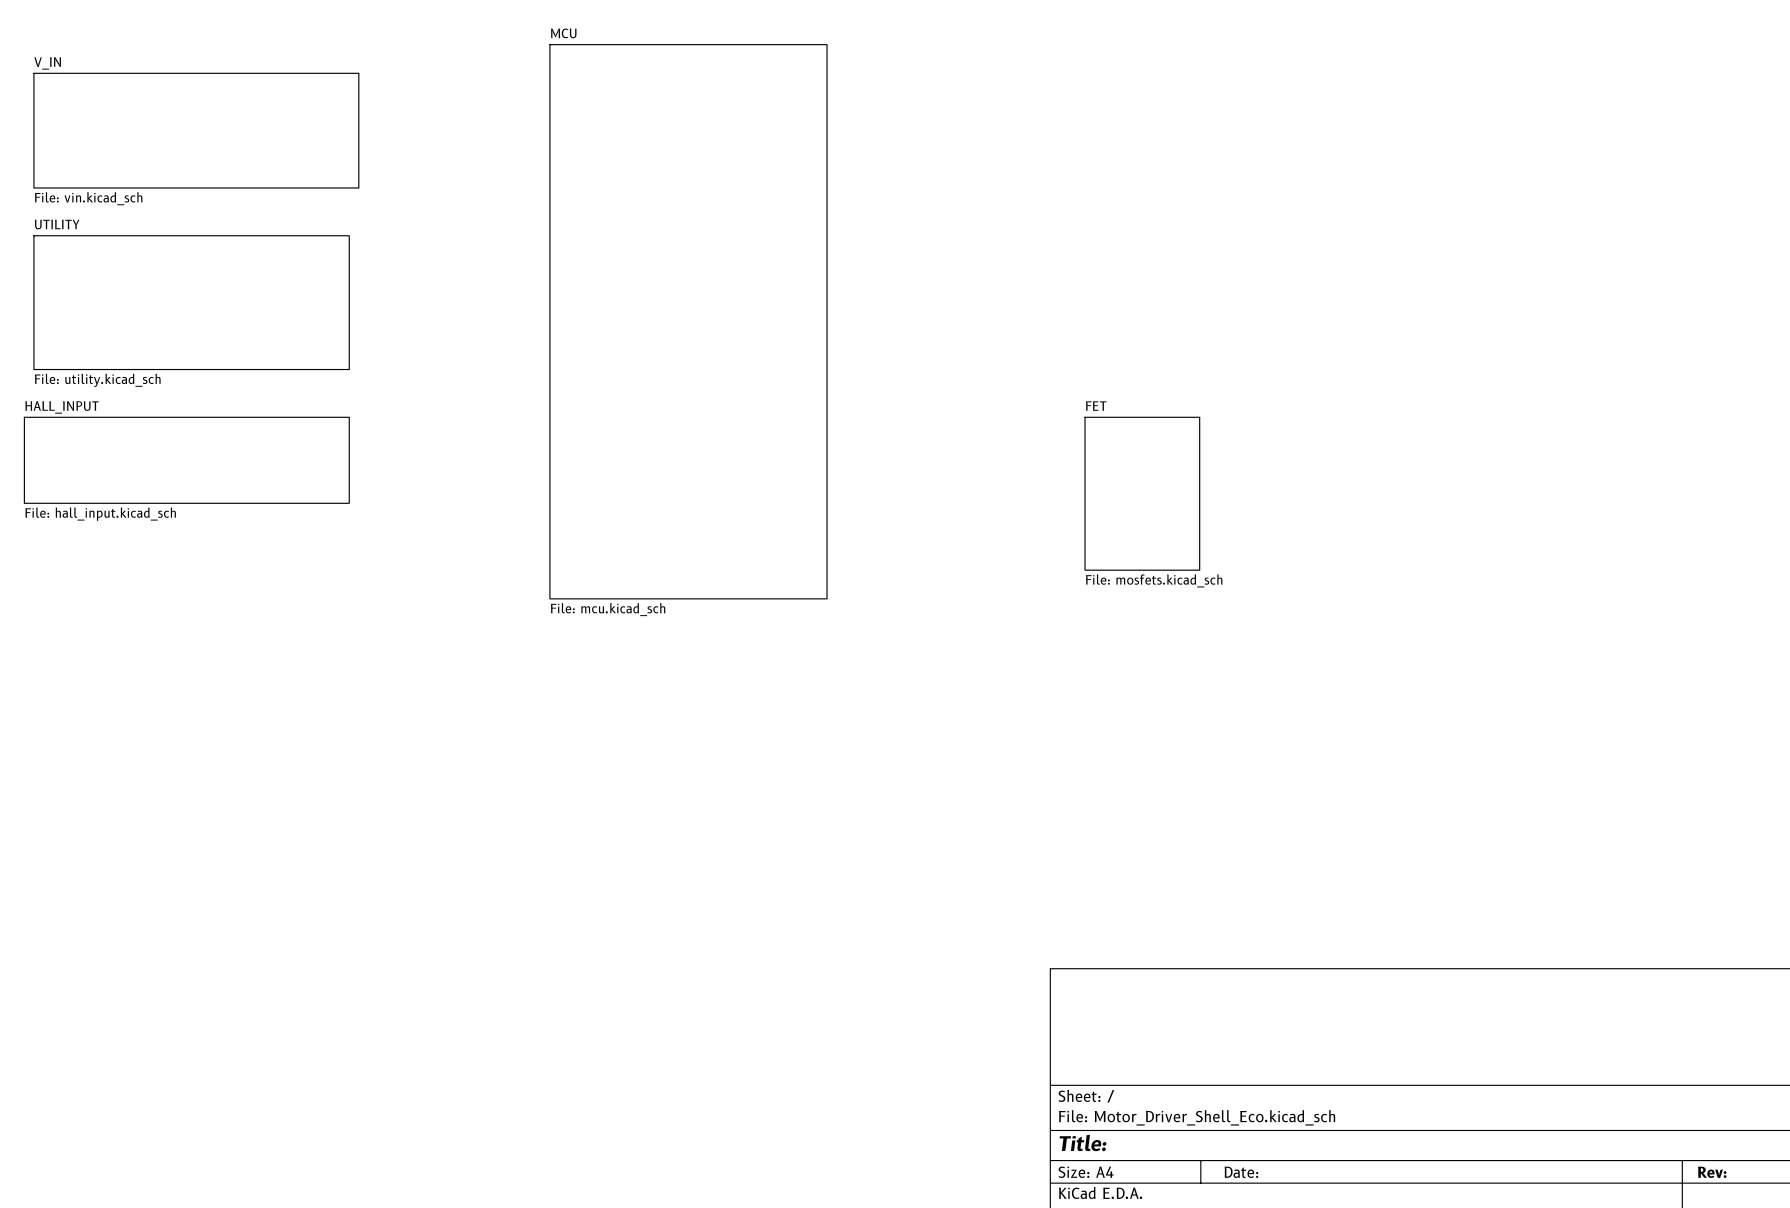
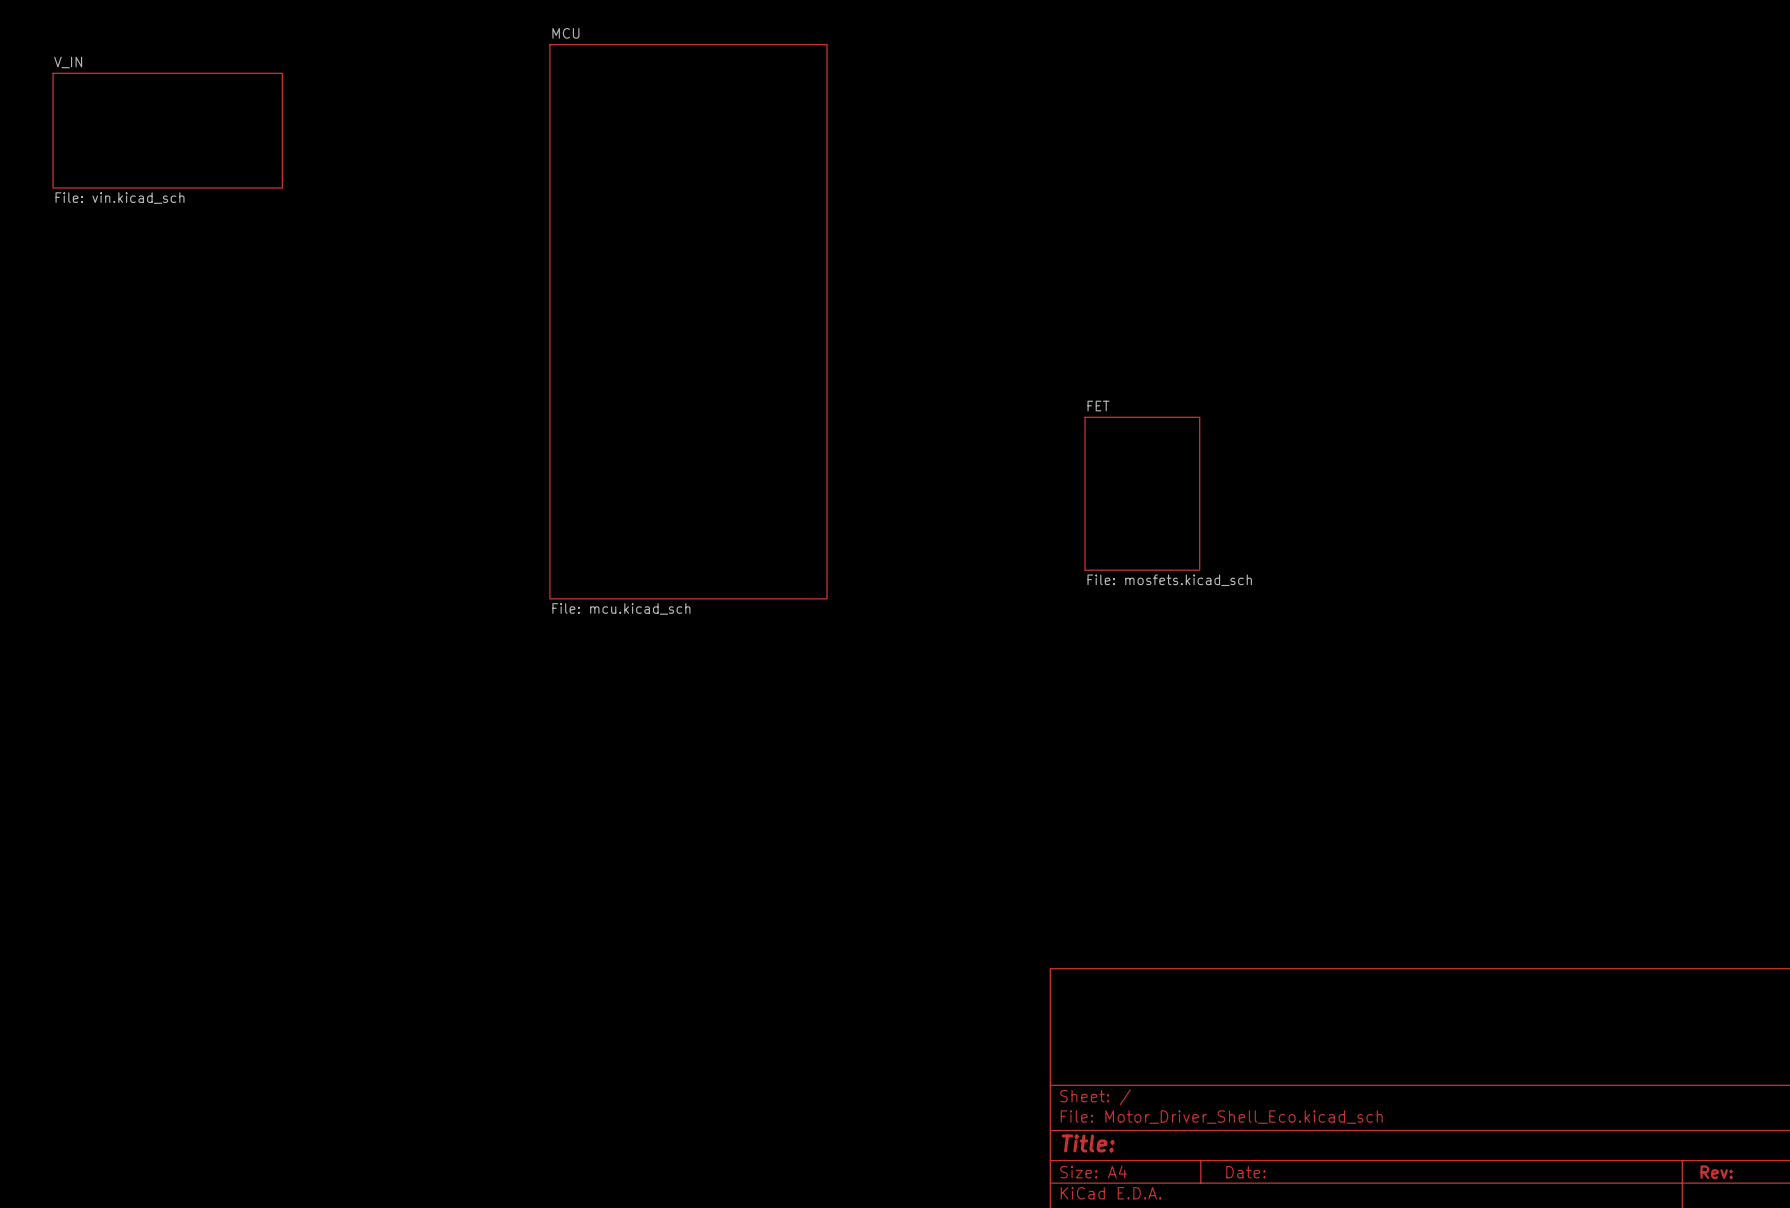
sheet V_IN: none -> File: vin.kicad_sch (167, 130)
sheet V_IN: File: vin.kicad_sch (196, 130) -> none
sheet UTILITY: File: utility.kicad_sch (191, 302) -> none
sheet HALL_INPUT: File: hall_input.kicad_sch (186, 460) -> none

